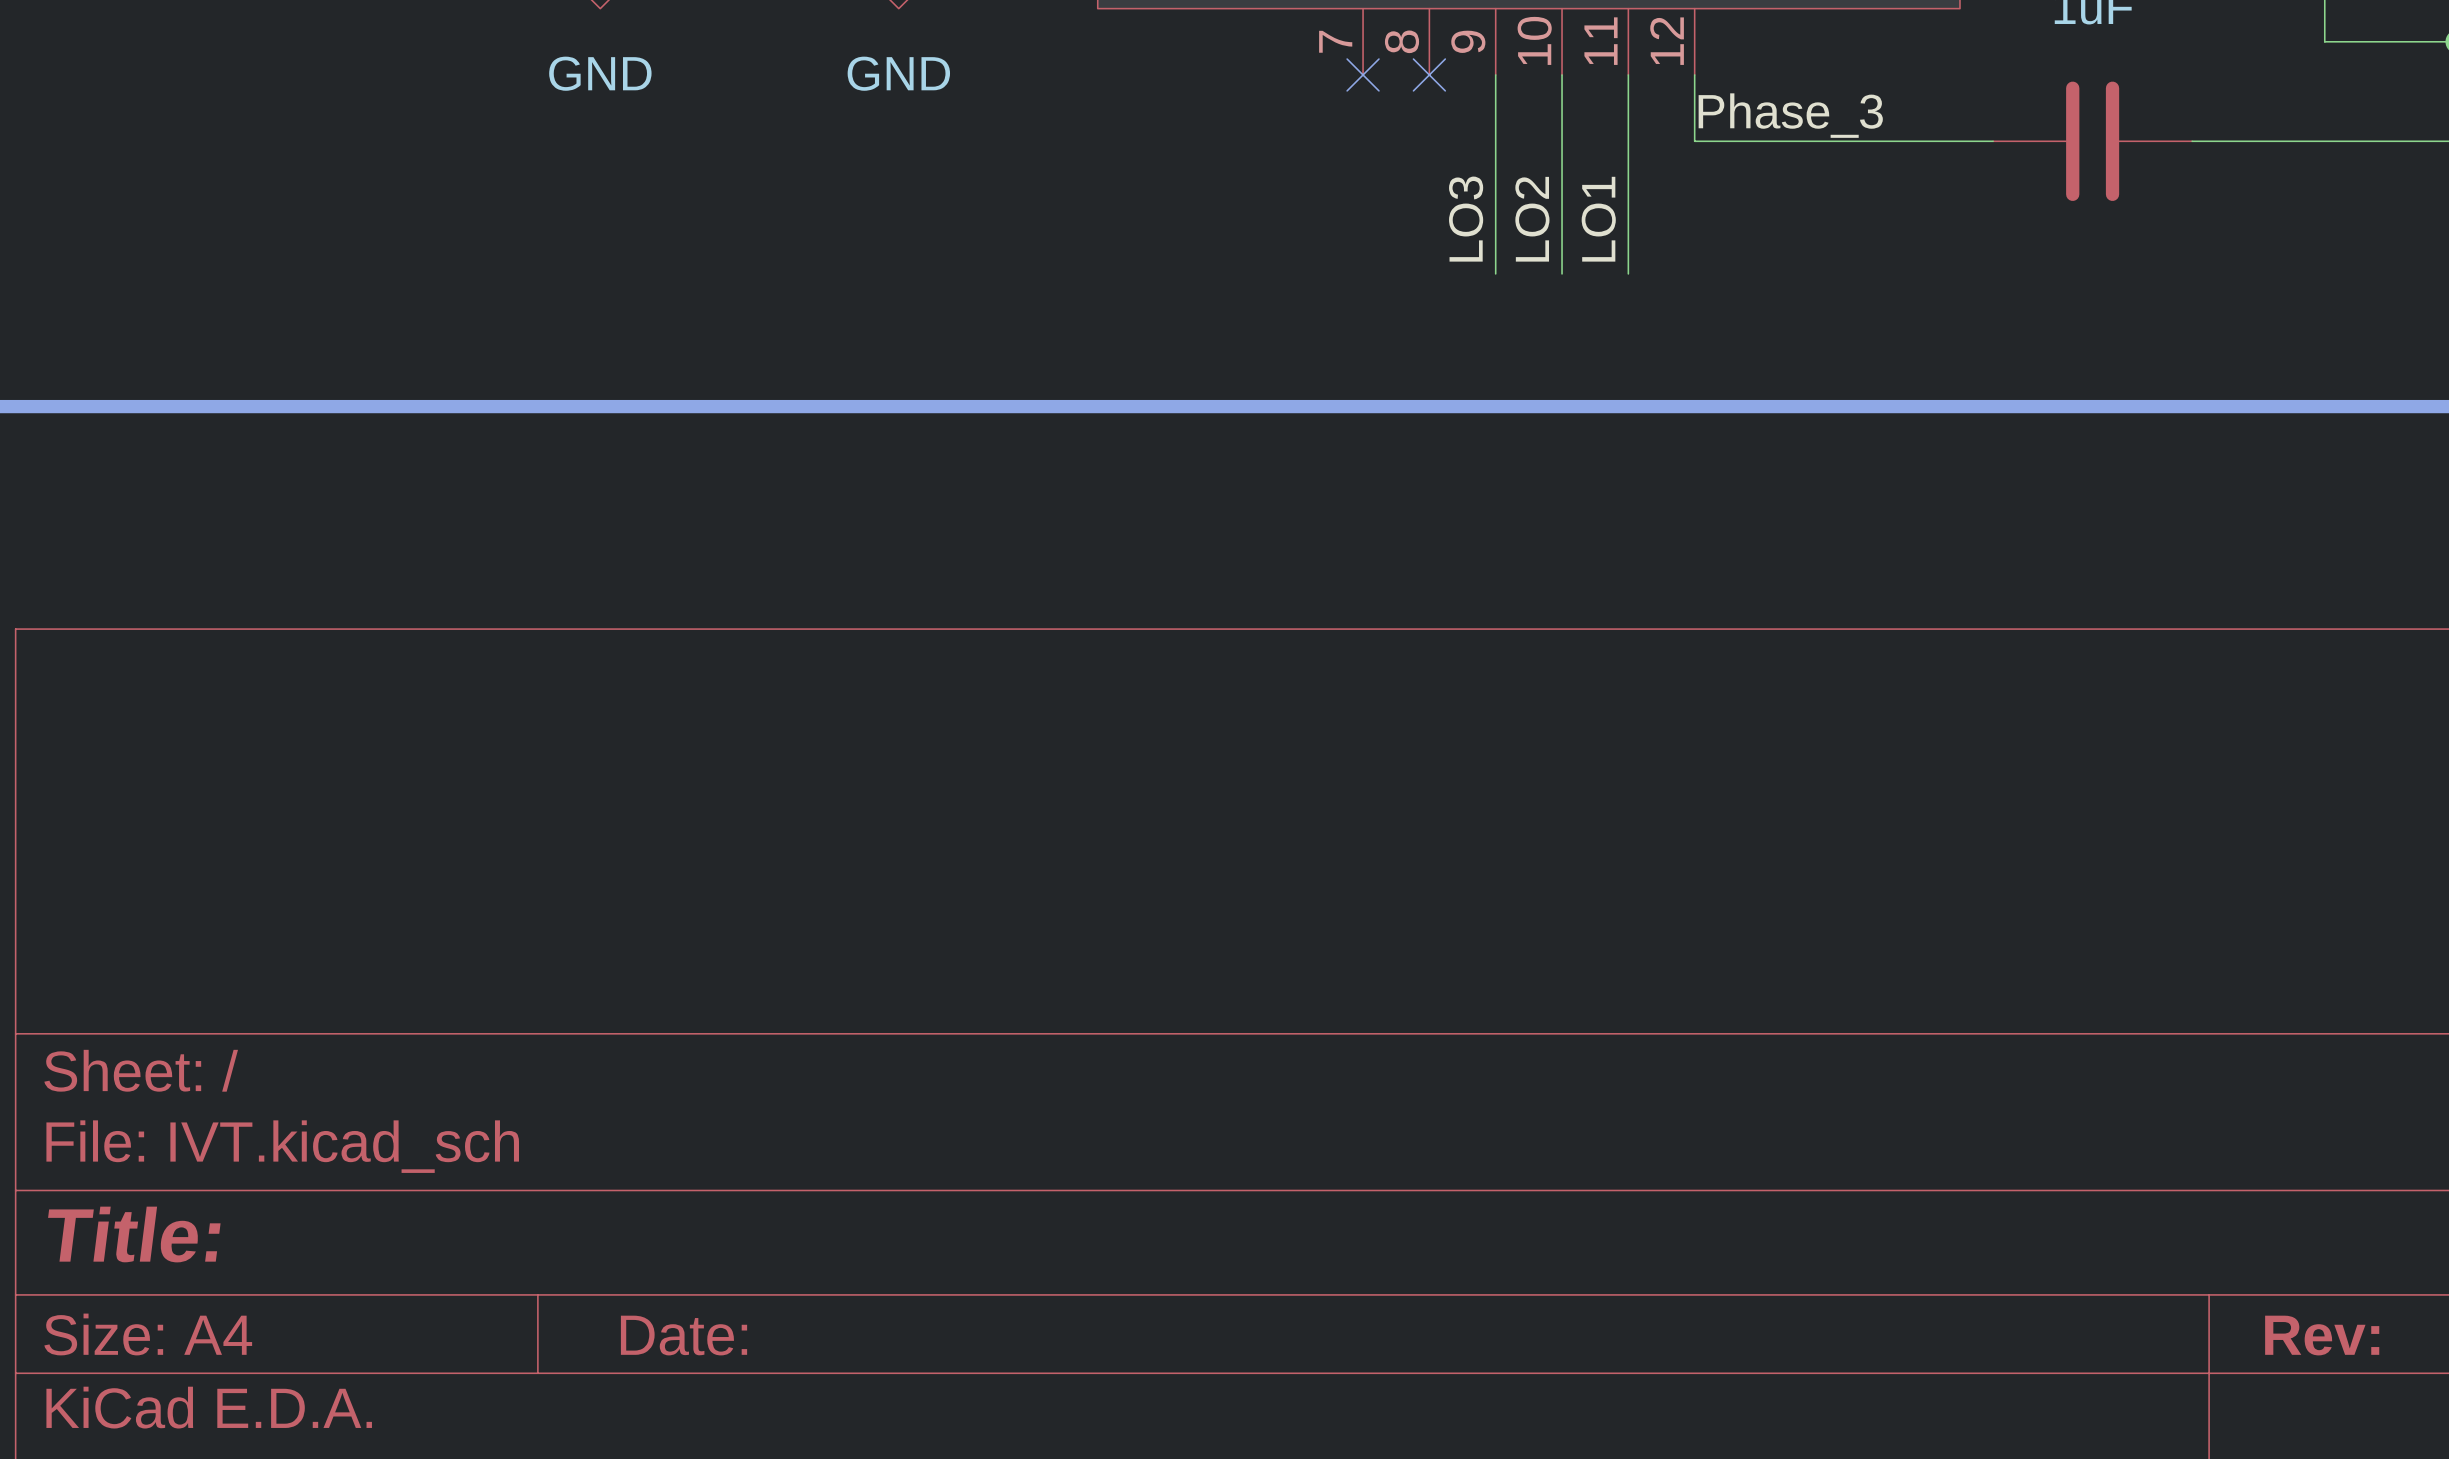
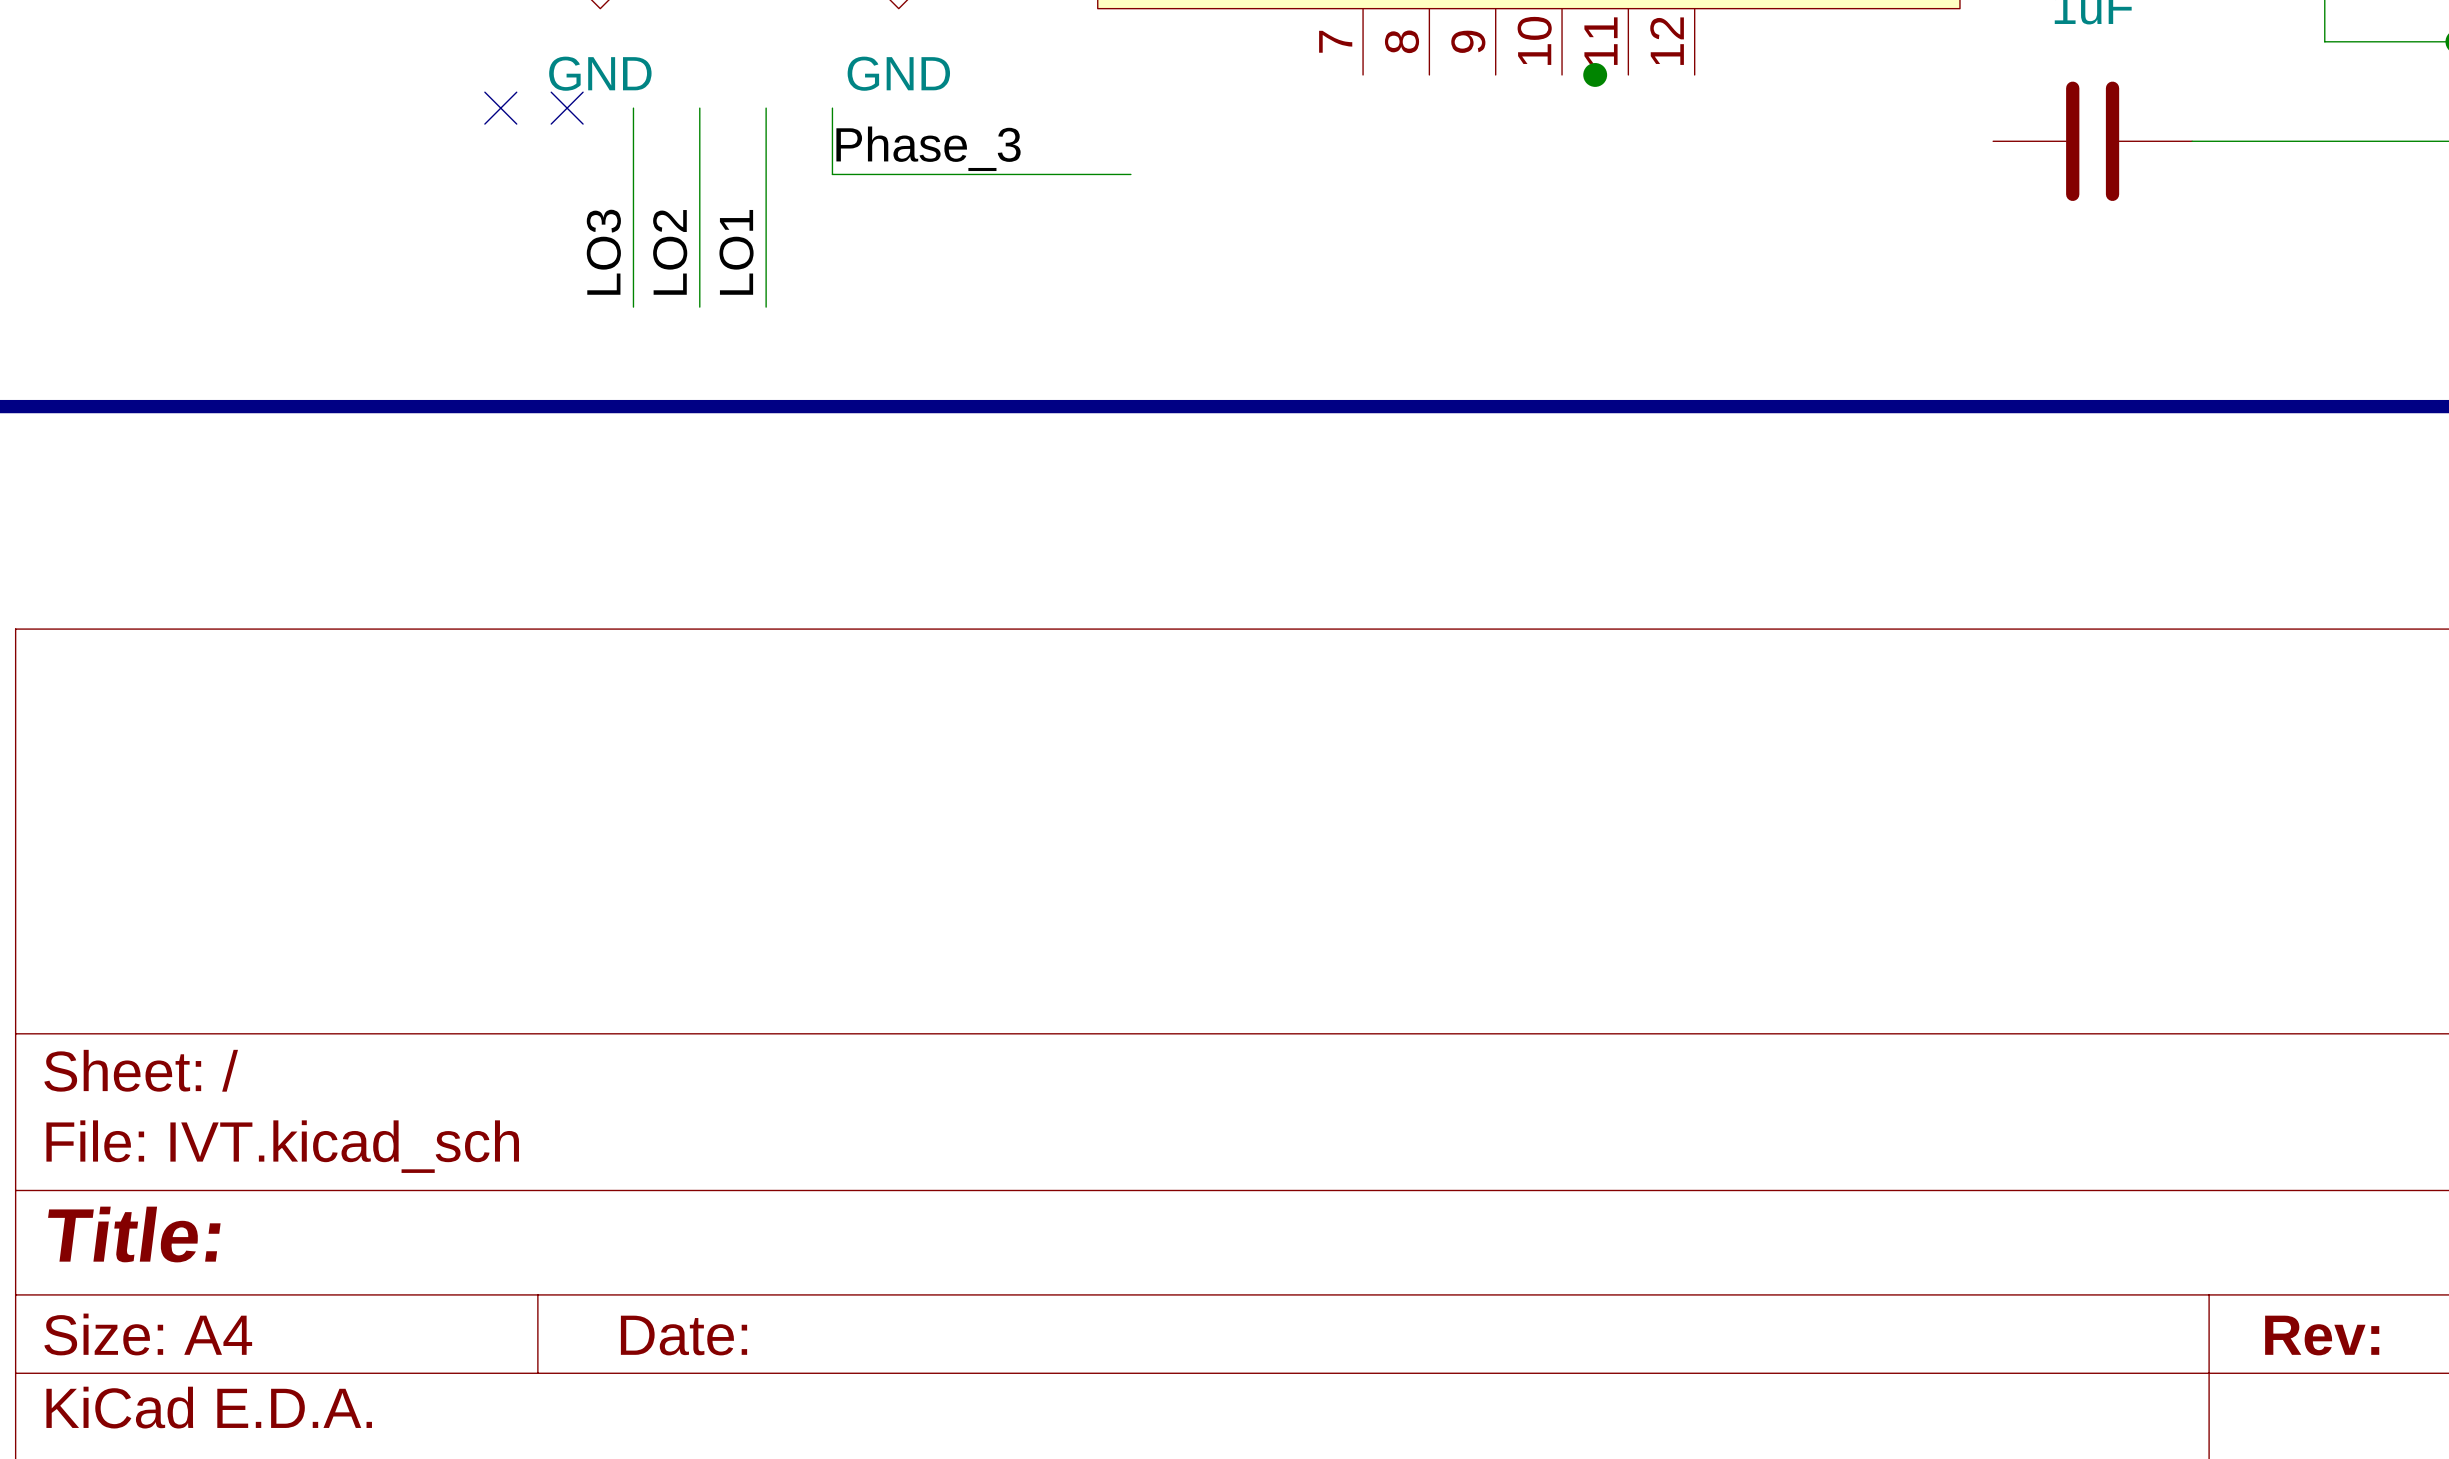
no-connect mark: (1363, 74) -> none
no-connect mark: (1429, 74) -> none
wire: (1495, 74) (1495, 273) -> none
wire: (1562, 74) (1562, 273) -> none
junction: none -> (1595, 74)
wire: (1628, 74) (1628, 273) -> none
wire: (1694, 74) (1694, 141) (1993, 141) -> none
no-connect mark: none -> (500, 108)
no-connect mark: none -> (567, 108)
wire: none -> (633, 108) (633, 307)
wire: none -> (699, 108) (699, 307)
wire: none -> (766, 108) (766, 307)
wire: none -> (832, 108) (832, 174) (1130, 174)
label: Phase_3 (1790, 115) -> none
label: none -> Phase_3 (928, 148)
label: LO3 (1466, 219) -> none
label: LO2 (1532, 219) -> none
label: LO1 (1598, 219) -> none
label: none -> LO3 (603, 252)
label: none -> LO2 (670, 252)
label: none -> LO1 (736, 252)

